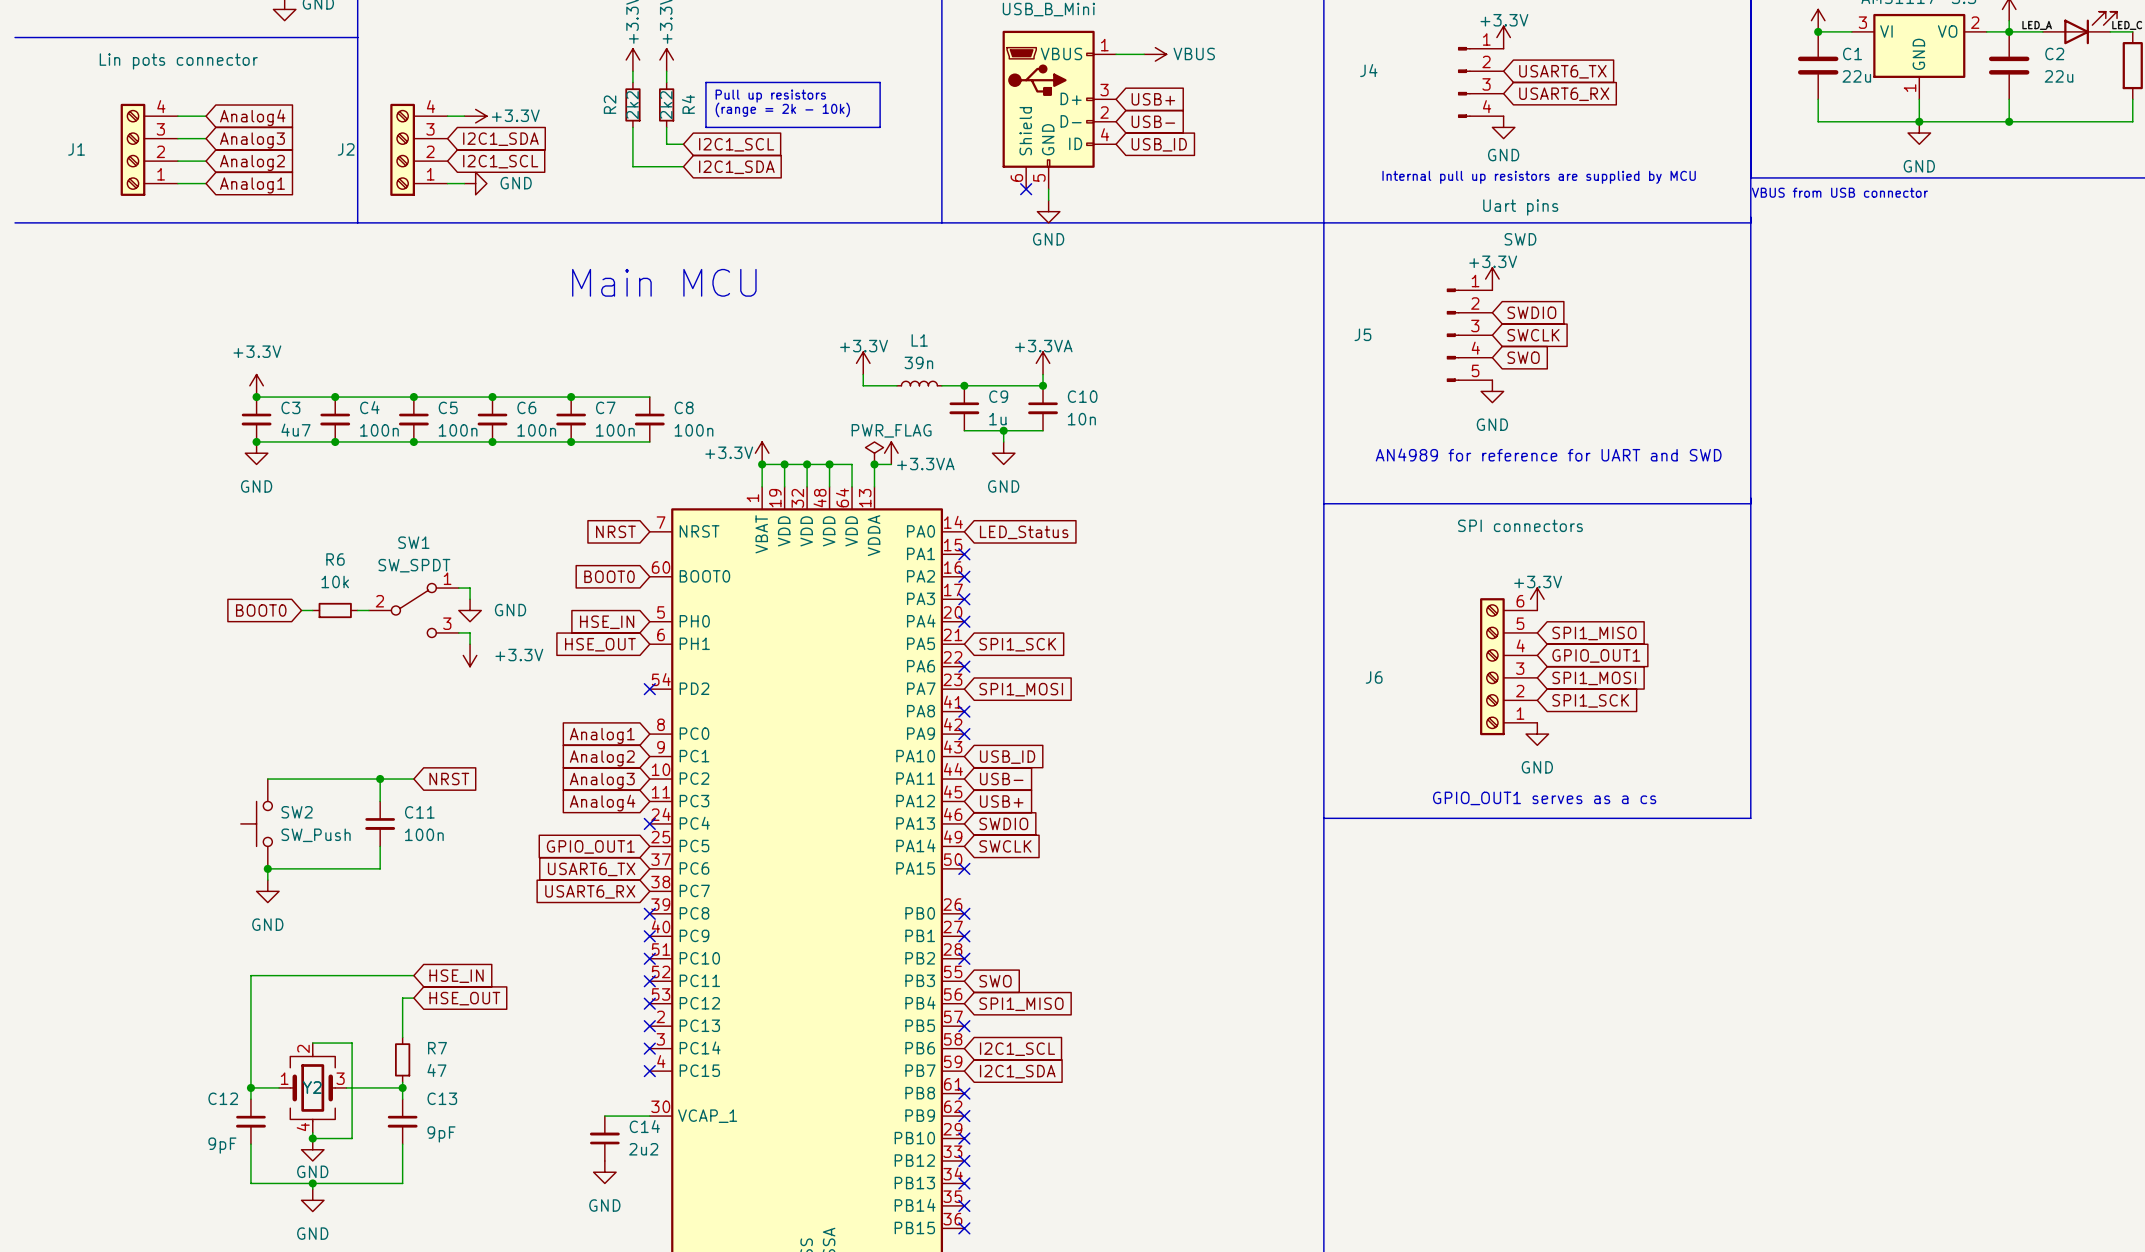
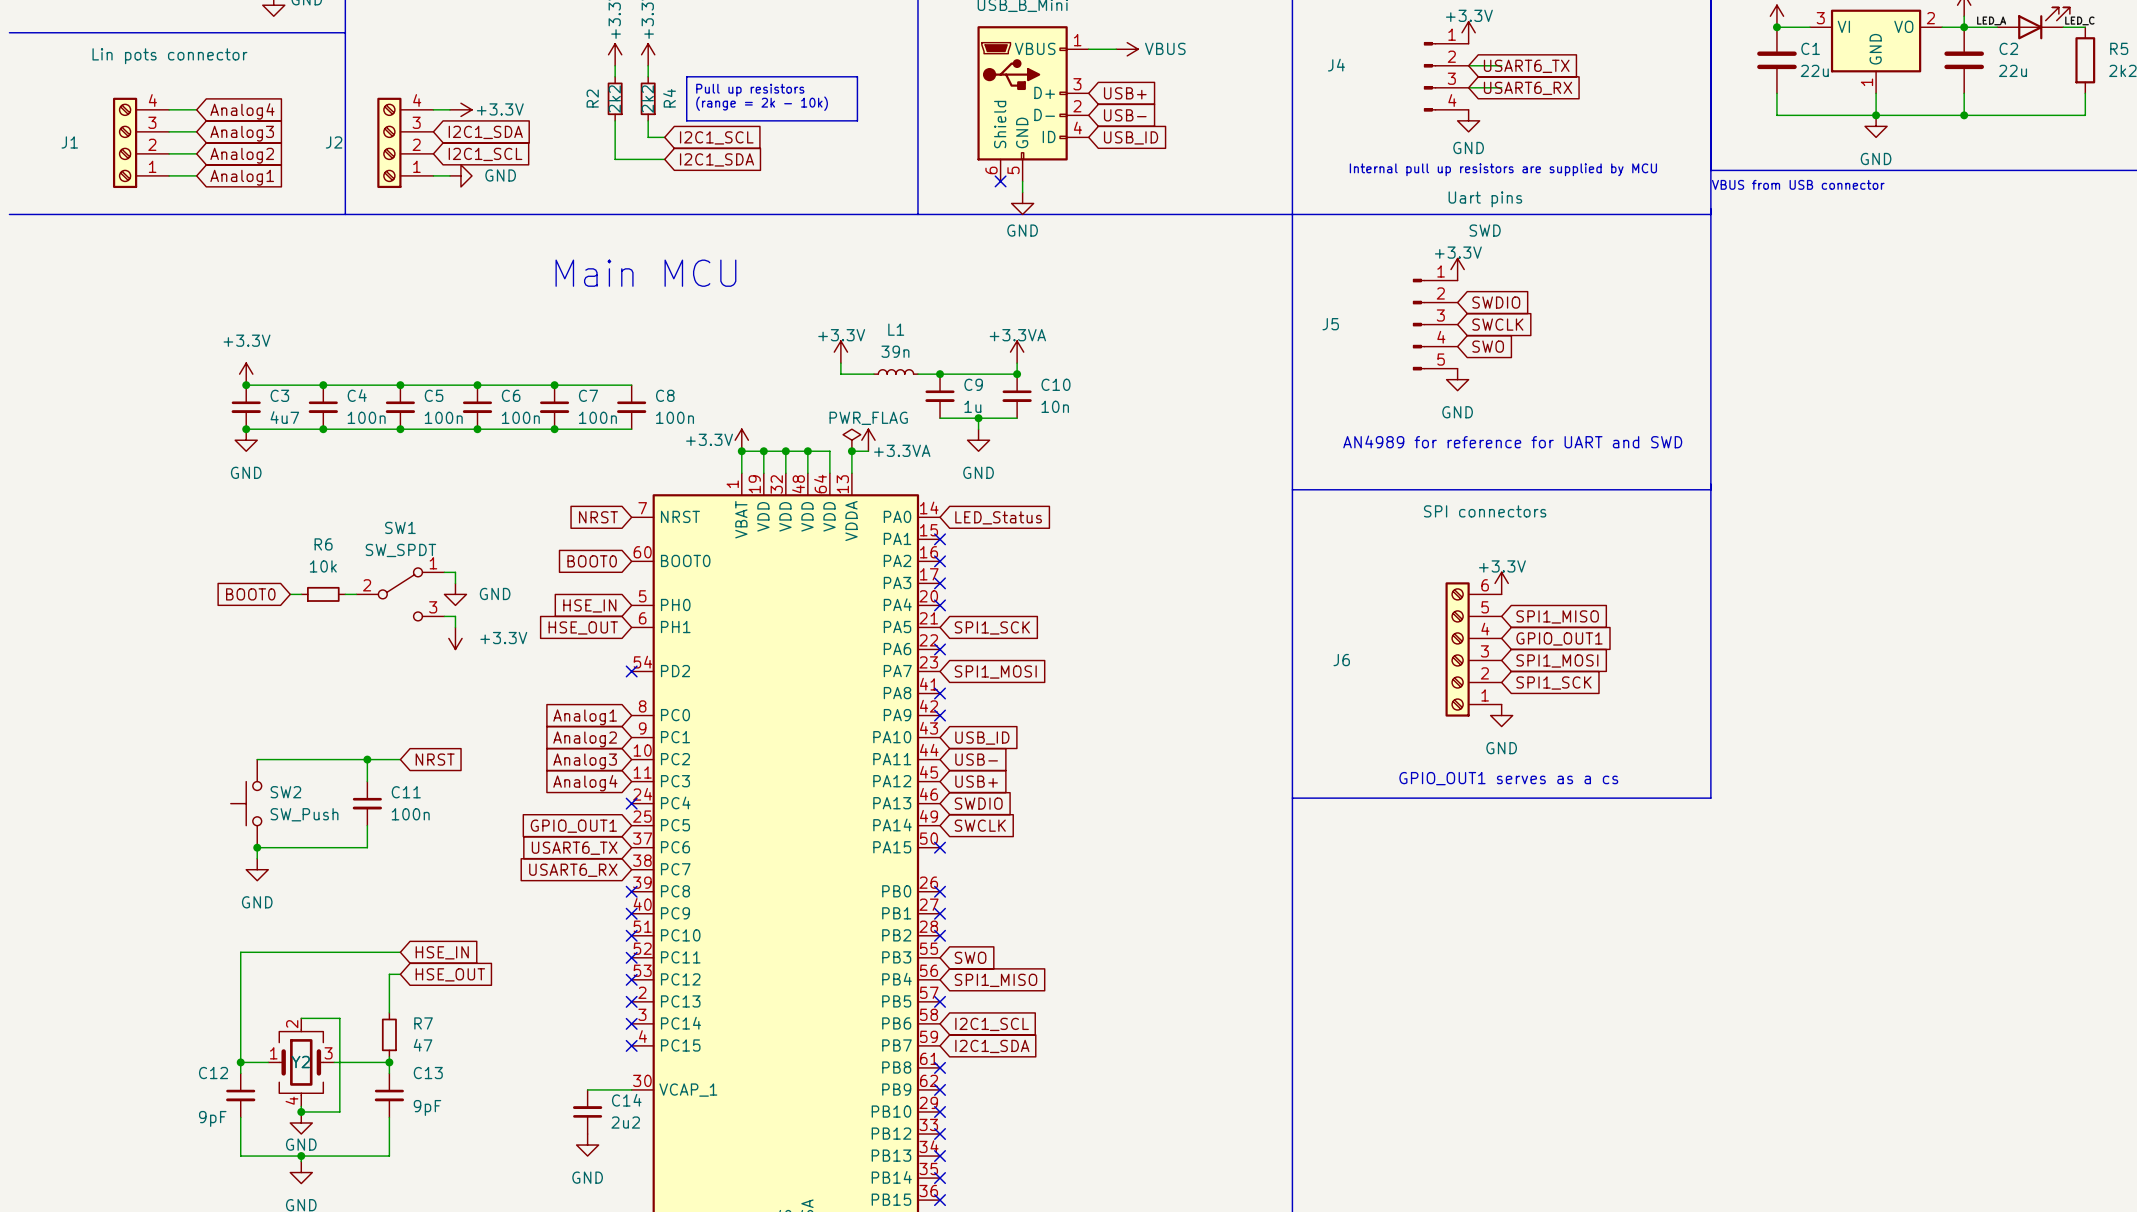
wire: none -> (1468, 65) (1501, 65)
wire: none -> (1468, 87) (1501, 87)

